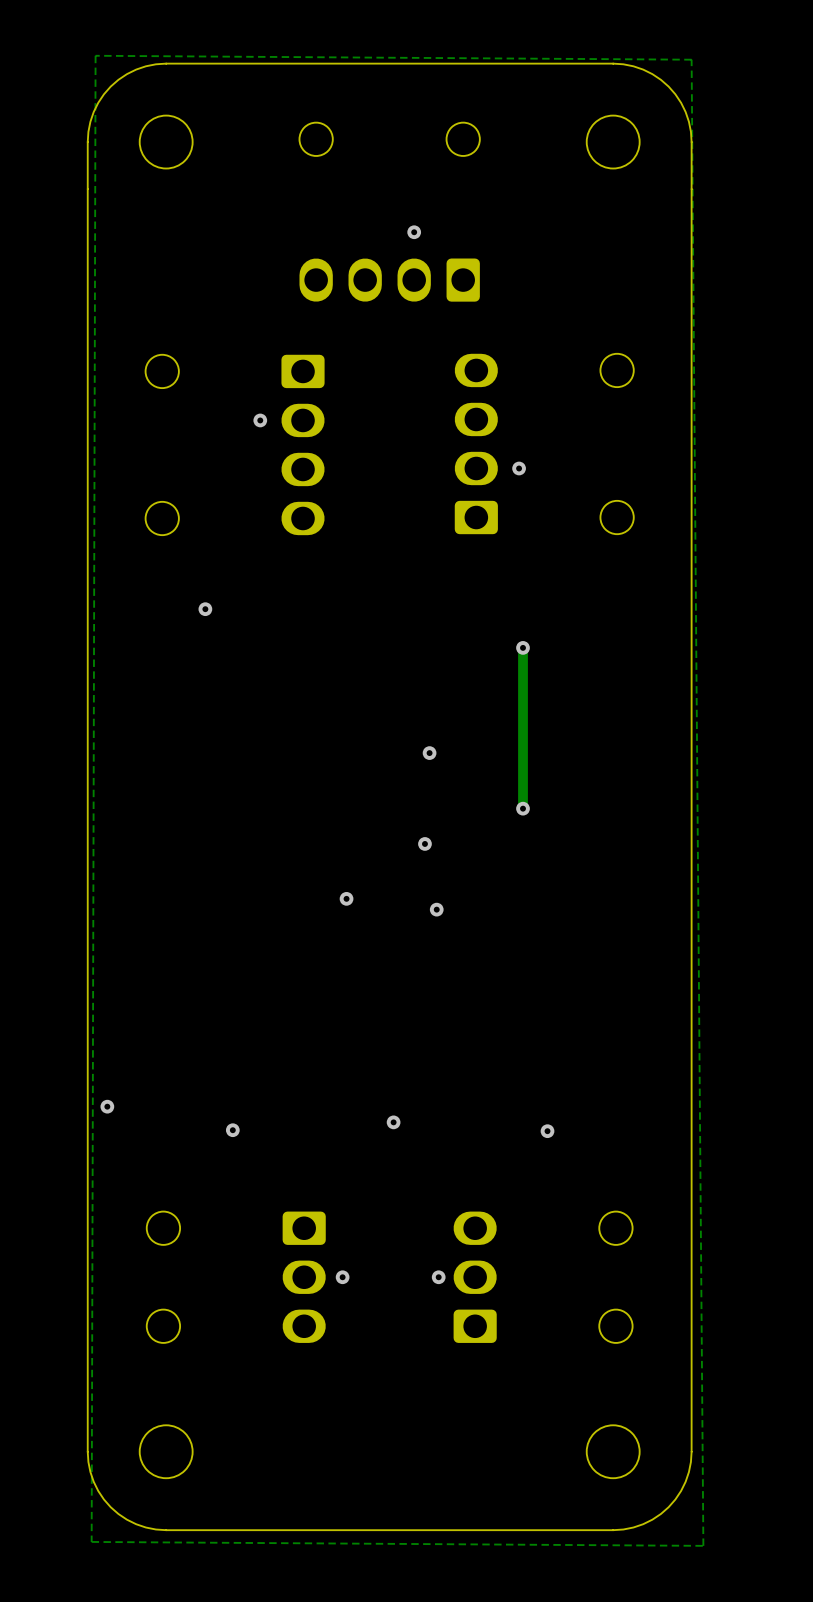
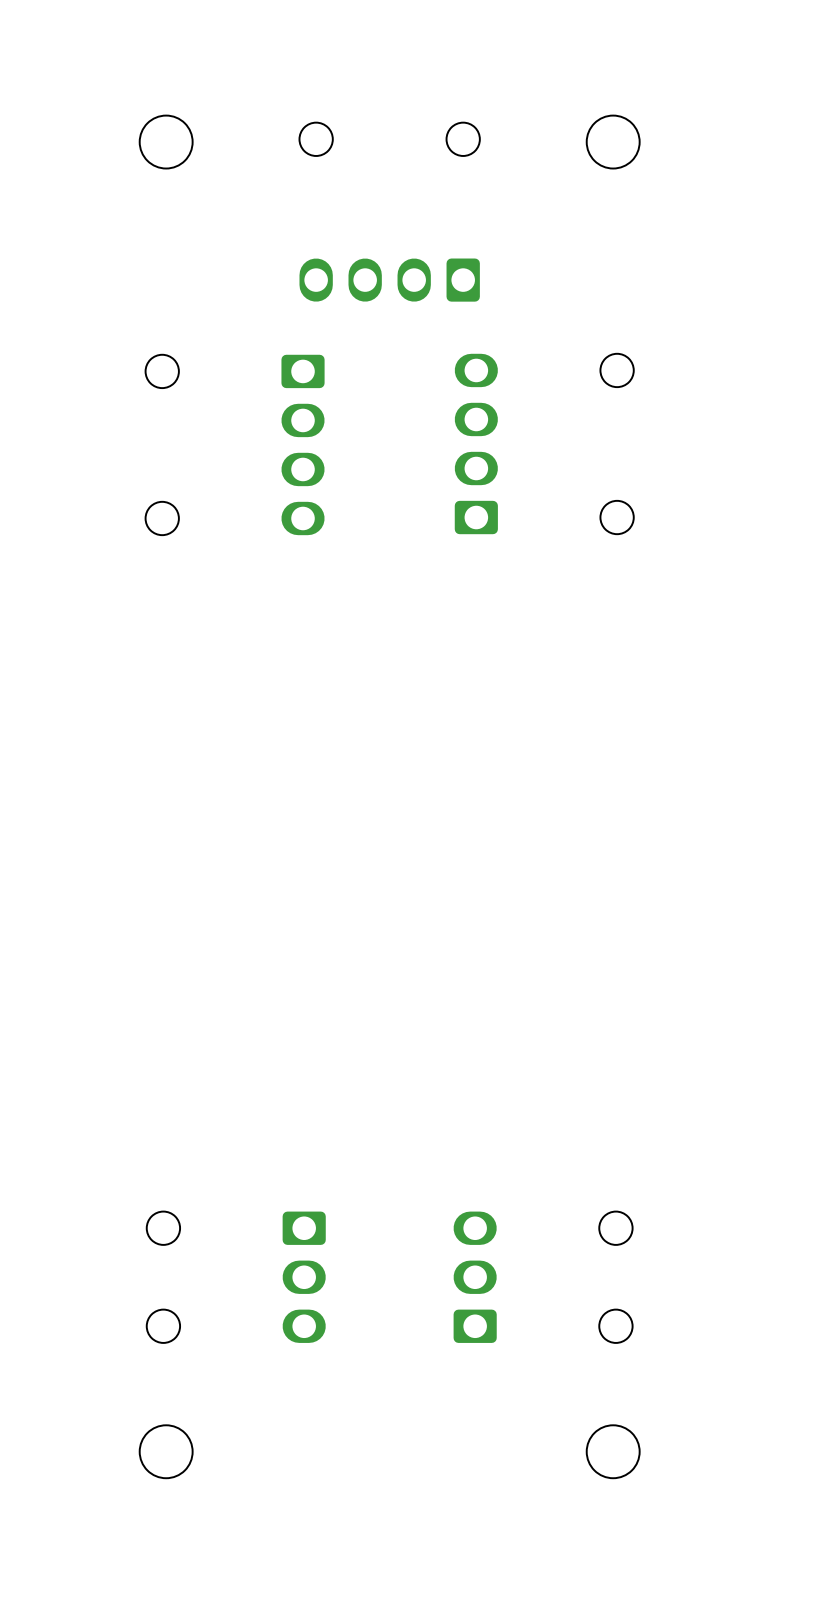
zone outline: (95, 55) (691, 59) (703, 1545) (91, 1541) (95, 55) -> none
board edge: (613, 63) (155, 64) (136, 69) (118, 79) (103, 94) (90, 121) (87, 142) (87, 1451) (90, 1472) (103, 1499) (126, 1519) (145, 1527) (166, 1530) (623, 1529) (652, 1519) (668, 1507) (681, 1490) (688, 1472) (691, 1451) (691, 142) (685, 112) (668, 86) (643, 69) (613, 63) -> none
via: (414, 232) -> none
via: (260, 420) -> none
via: (519, 468) -> none
via: (205, 609) -> none
track: (523, 647) (523, 808) -> none
via: (523, 647) -> none
via: (429, 753) -> none
via: (523, 808) -> none
via: (424, 843) -> none
via: (346, 898) -> none
via: (436, 909) -> none
via: (107, 1106) -> none
via: (393, 1122) -> none
via: (232, 1130) -> none
via: (547, 1131) -> none
via: (342, 1277) -> none
via: (438, 1277) -> none

